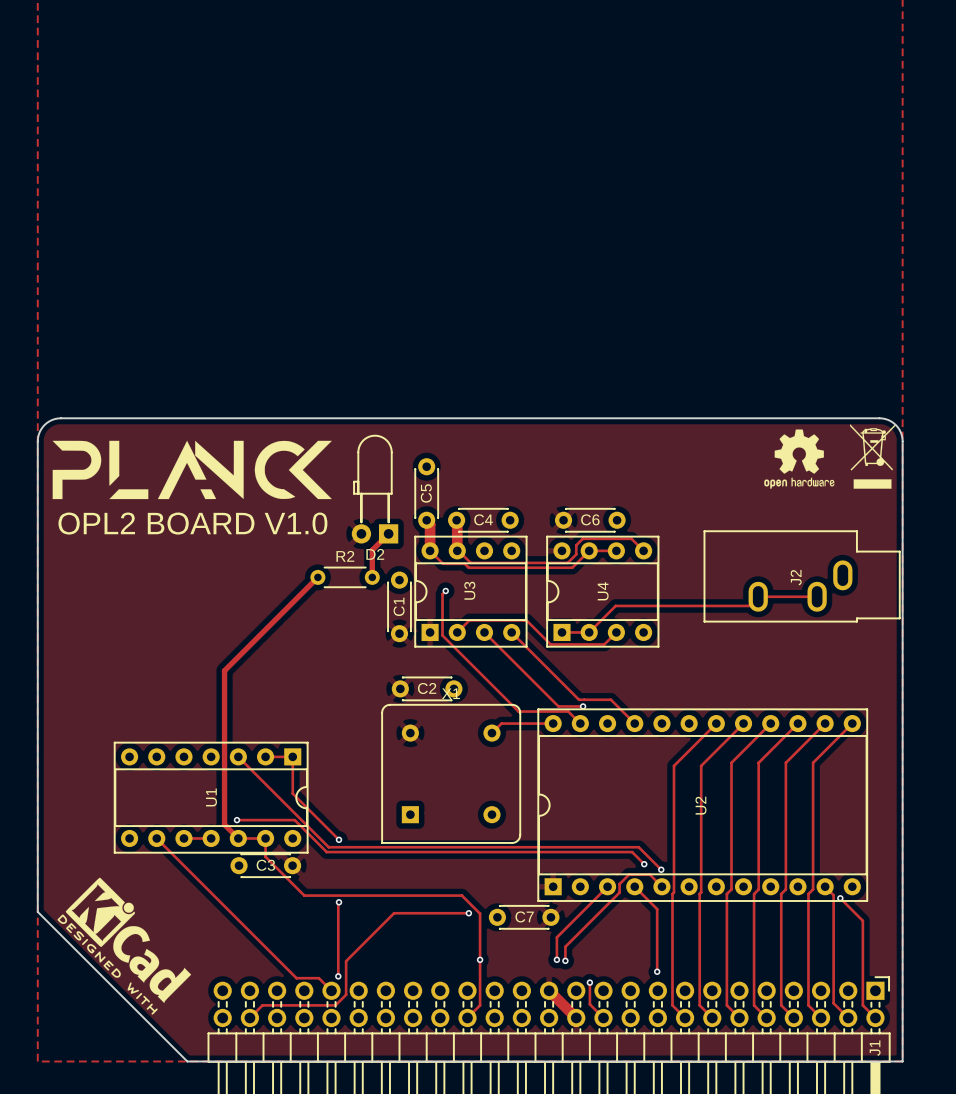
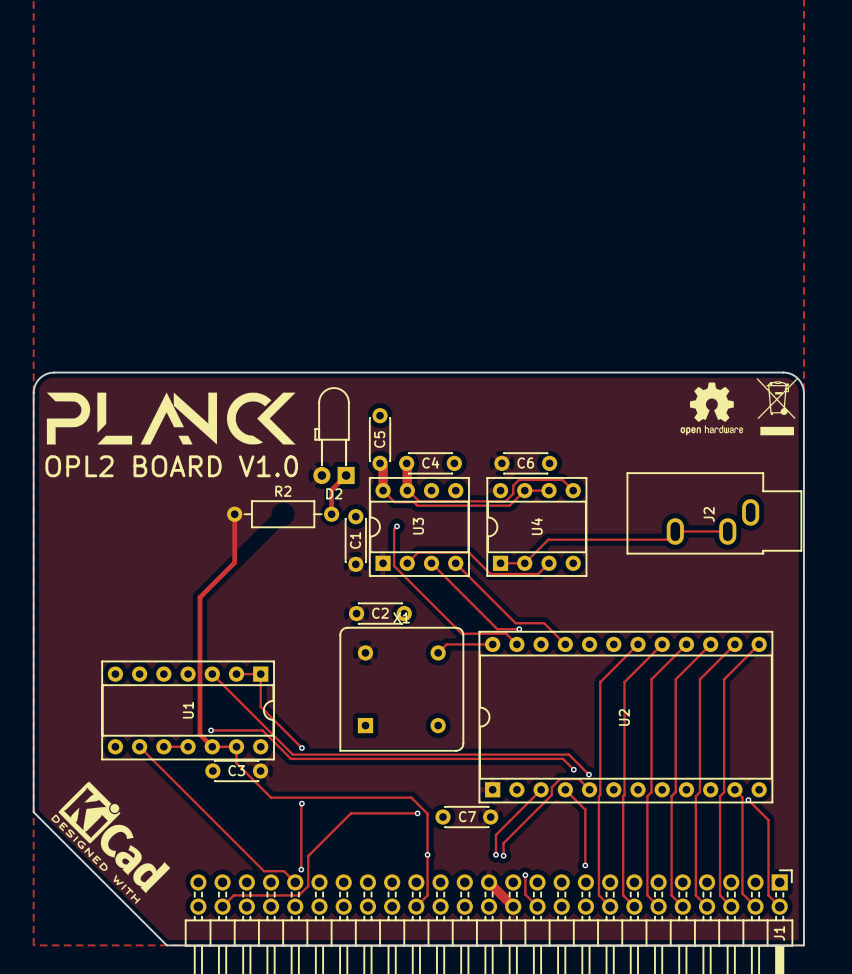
R2 footprint: [310, 566, 380, 588] -> [227, 500, 340, 528]
track: (317, 577) (263, 631) -> (234, 514) (234, 562)

